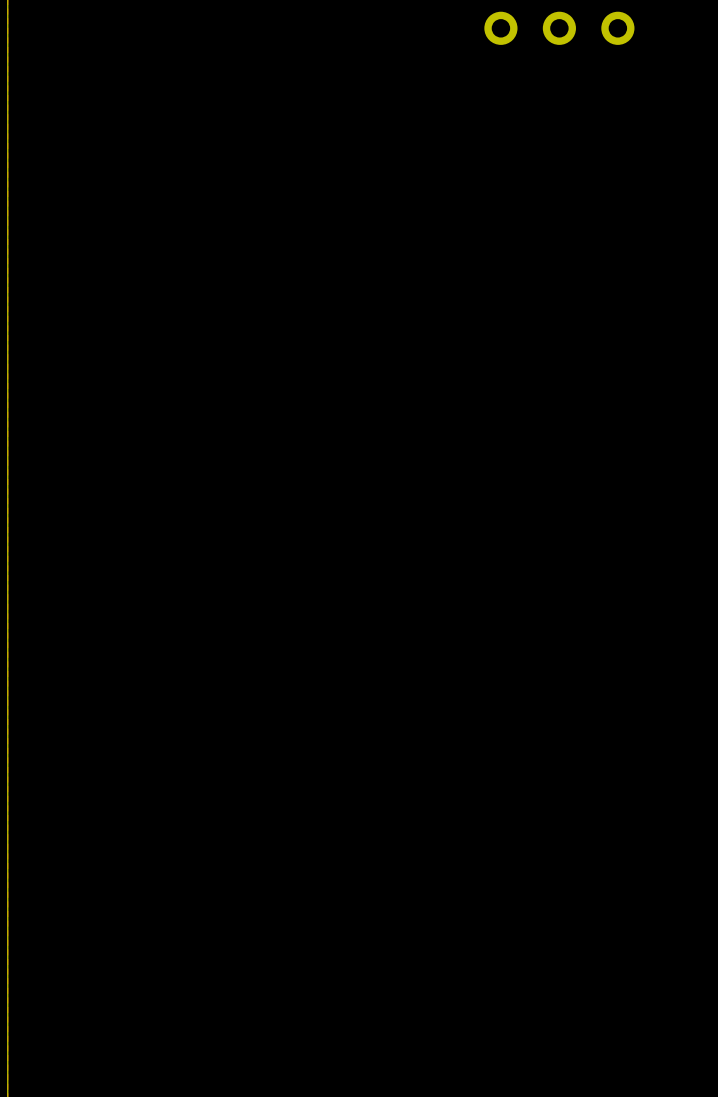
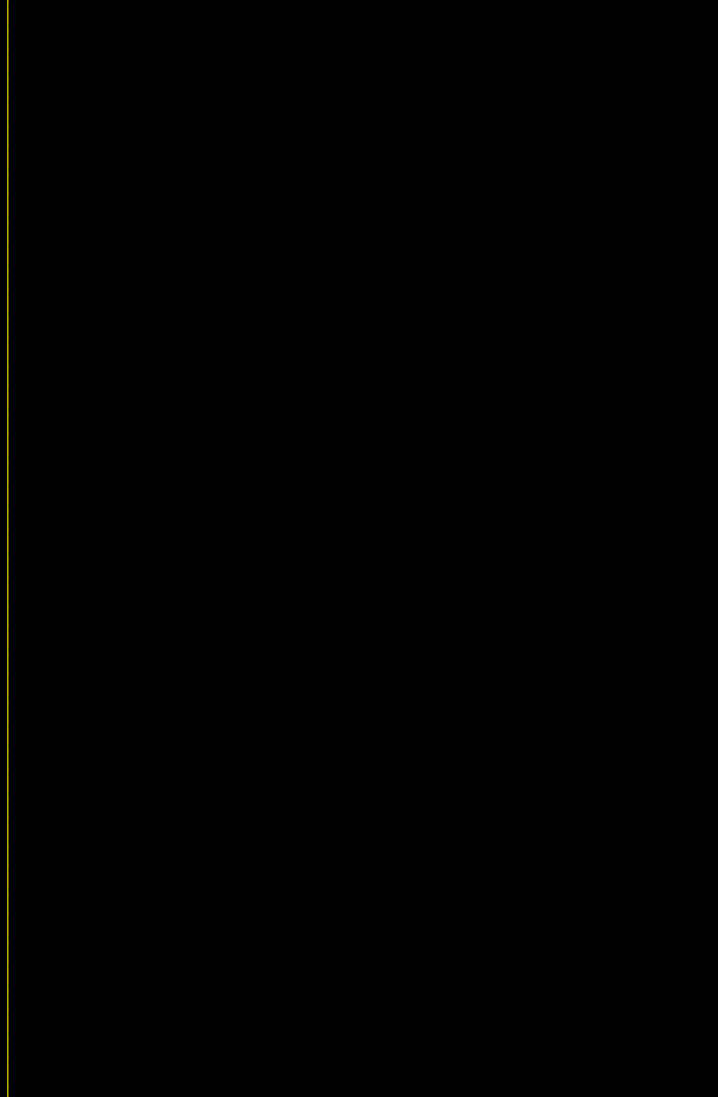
part: (559, 28) -> none

